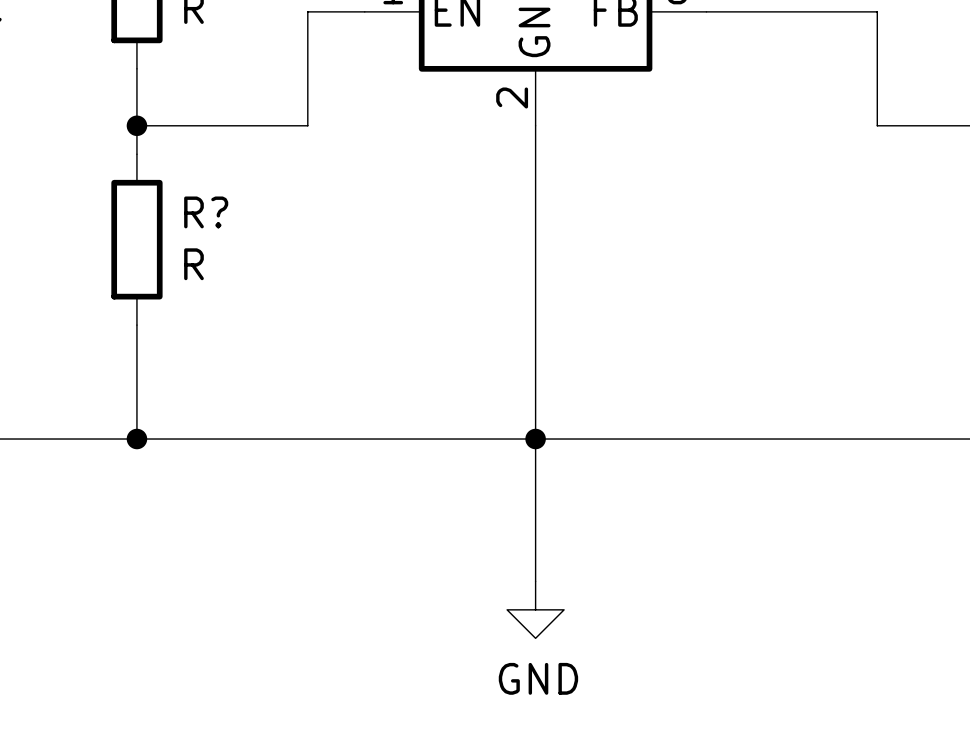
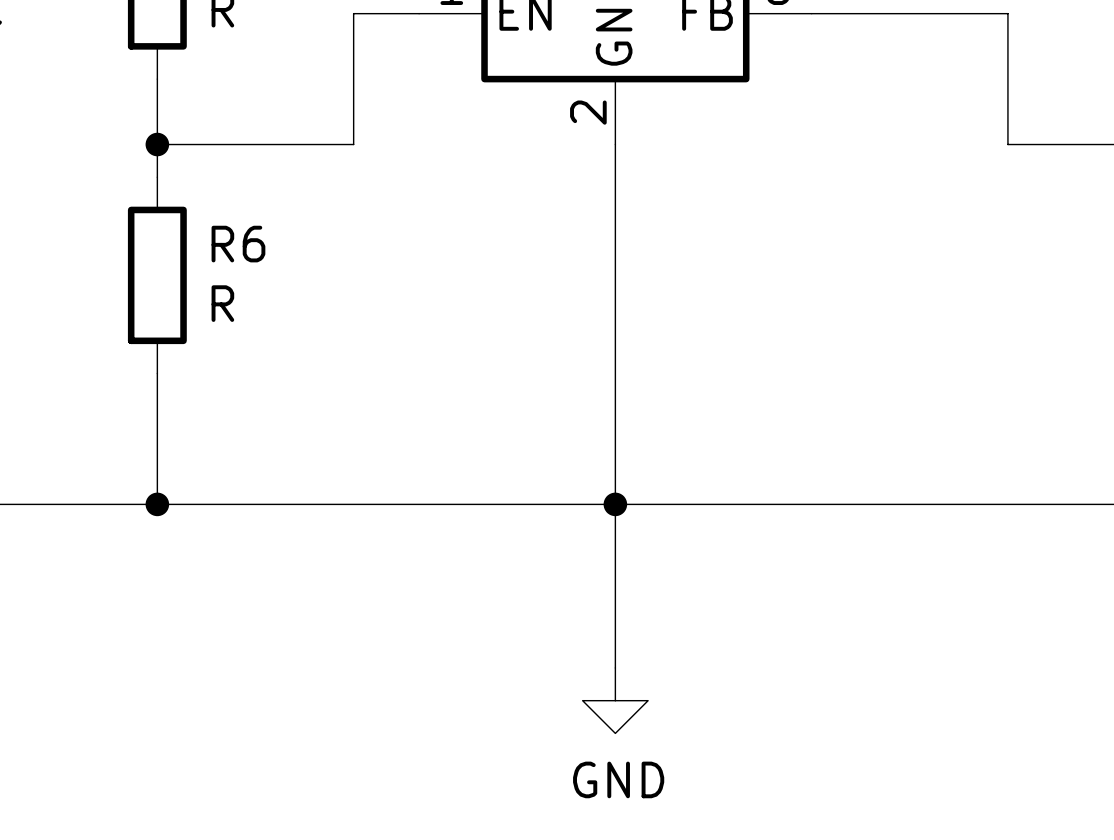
R? name: R? (206, 212) -> R6 (238, 244)

